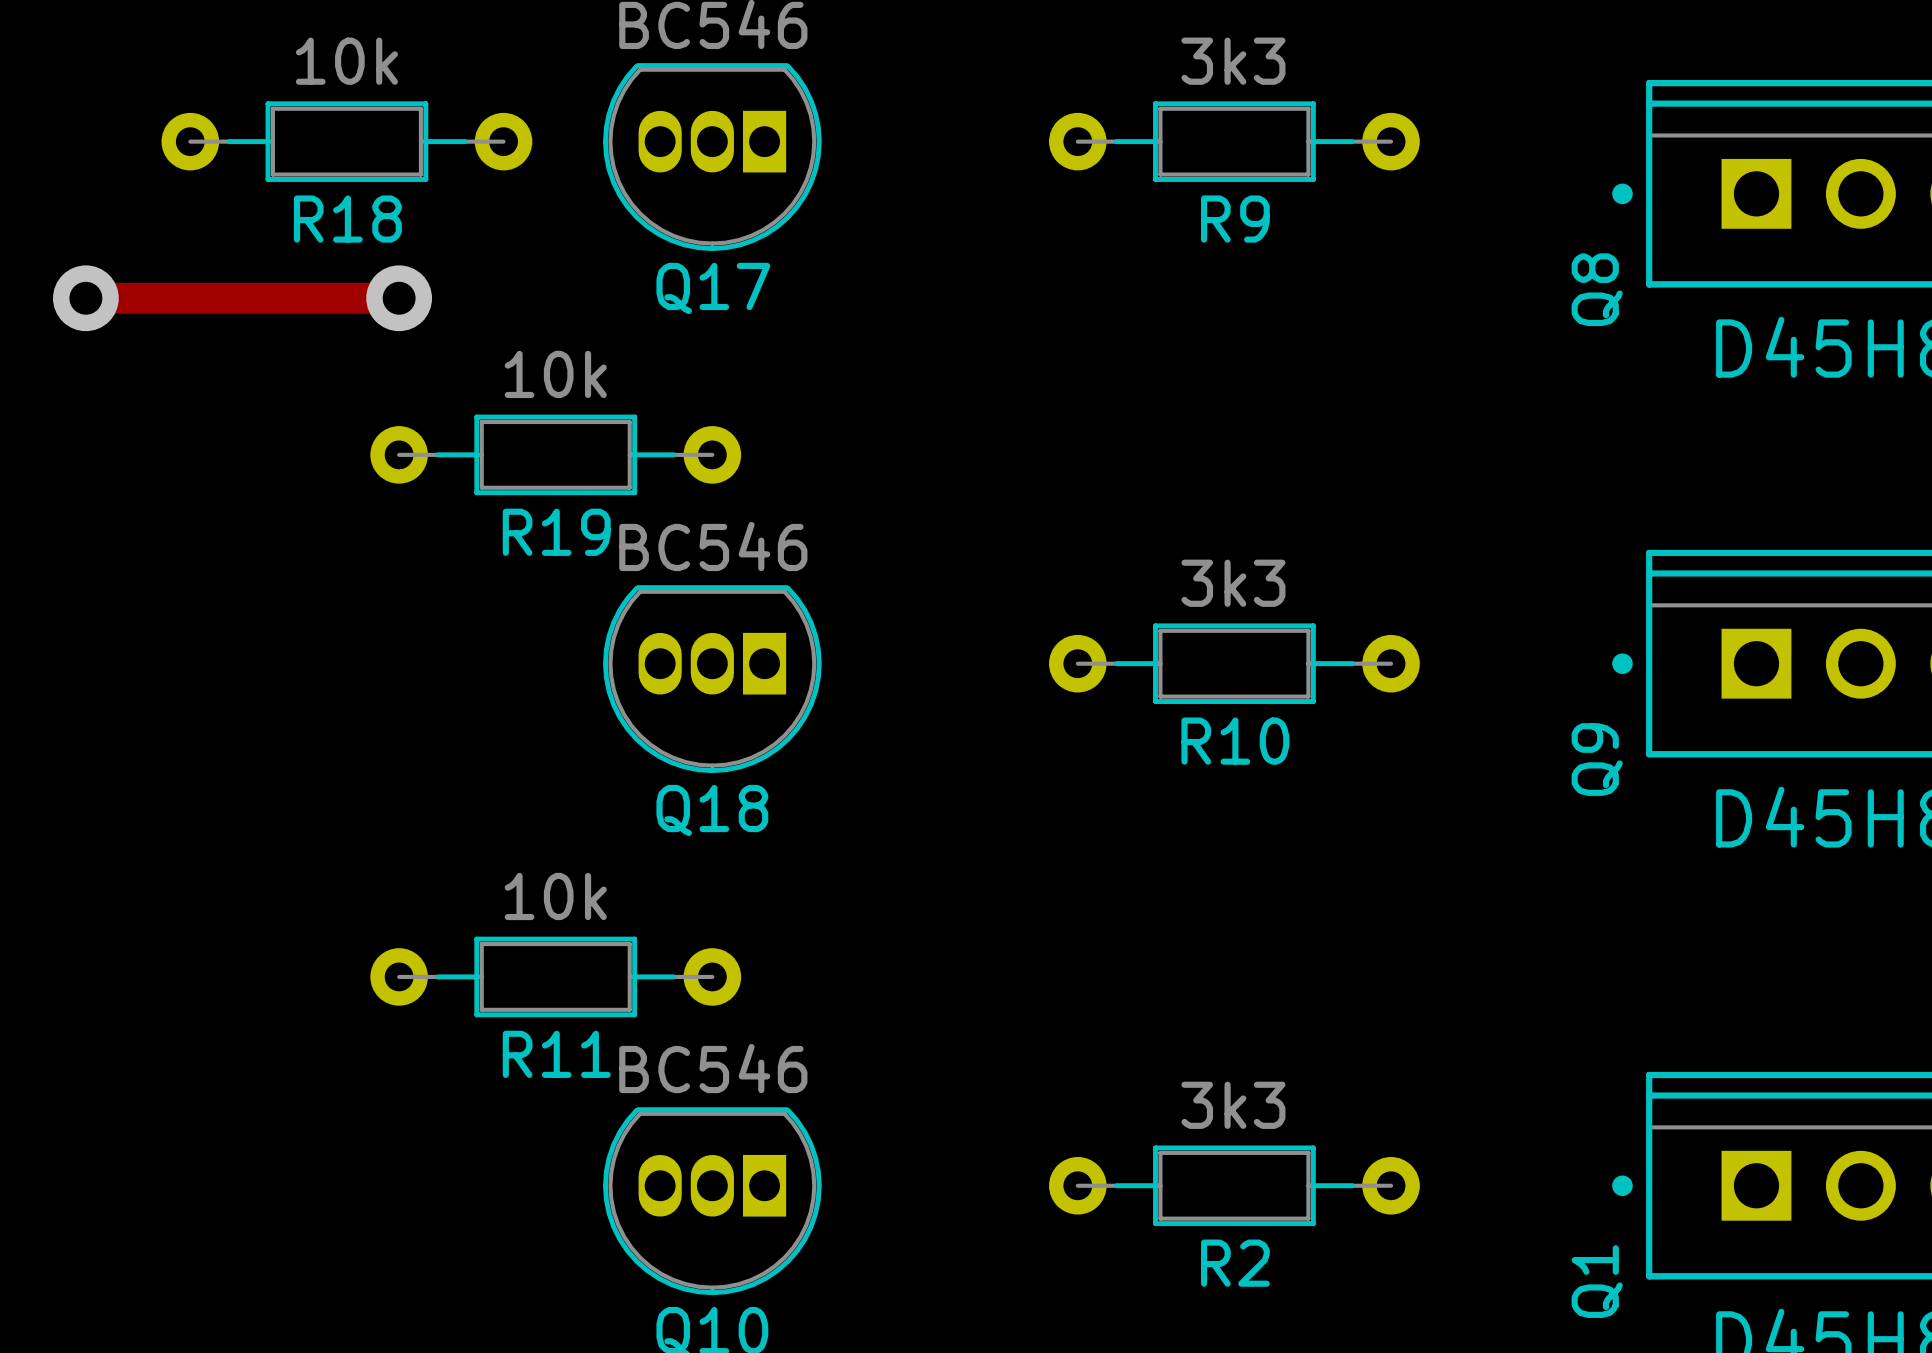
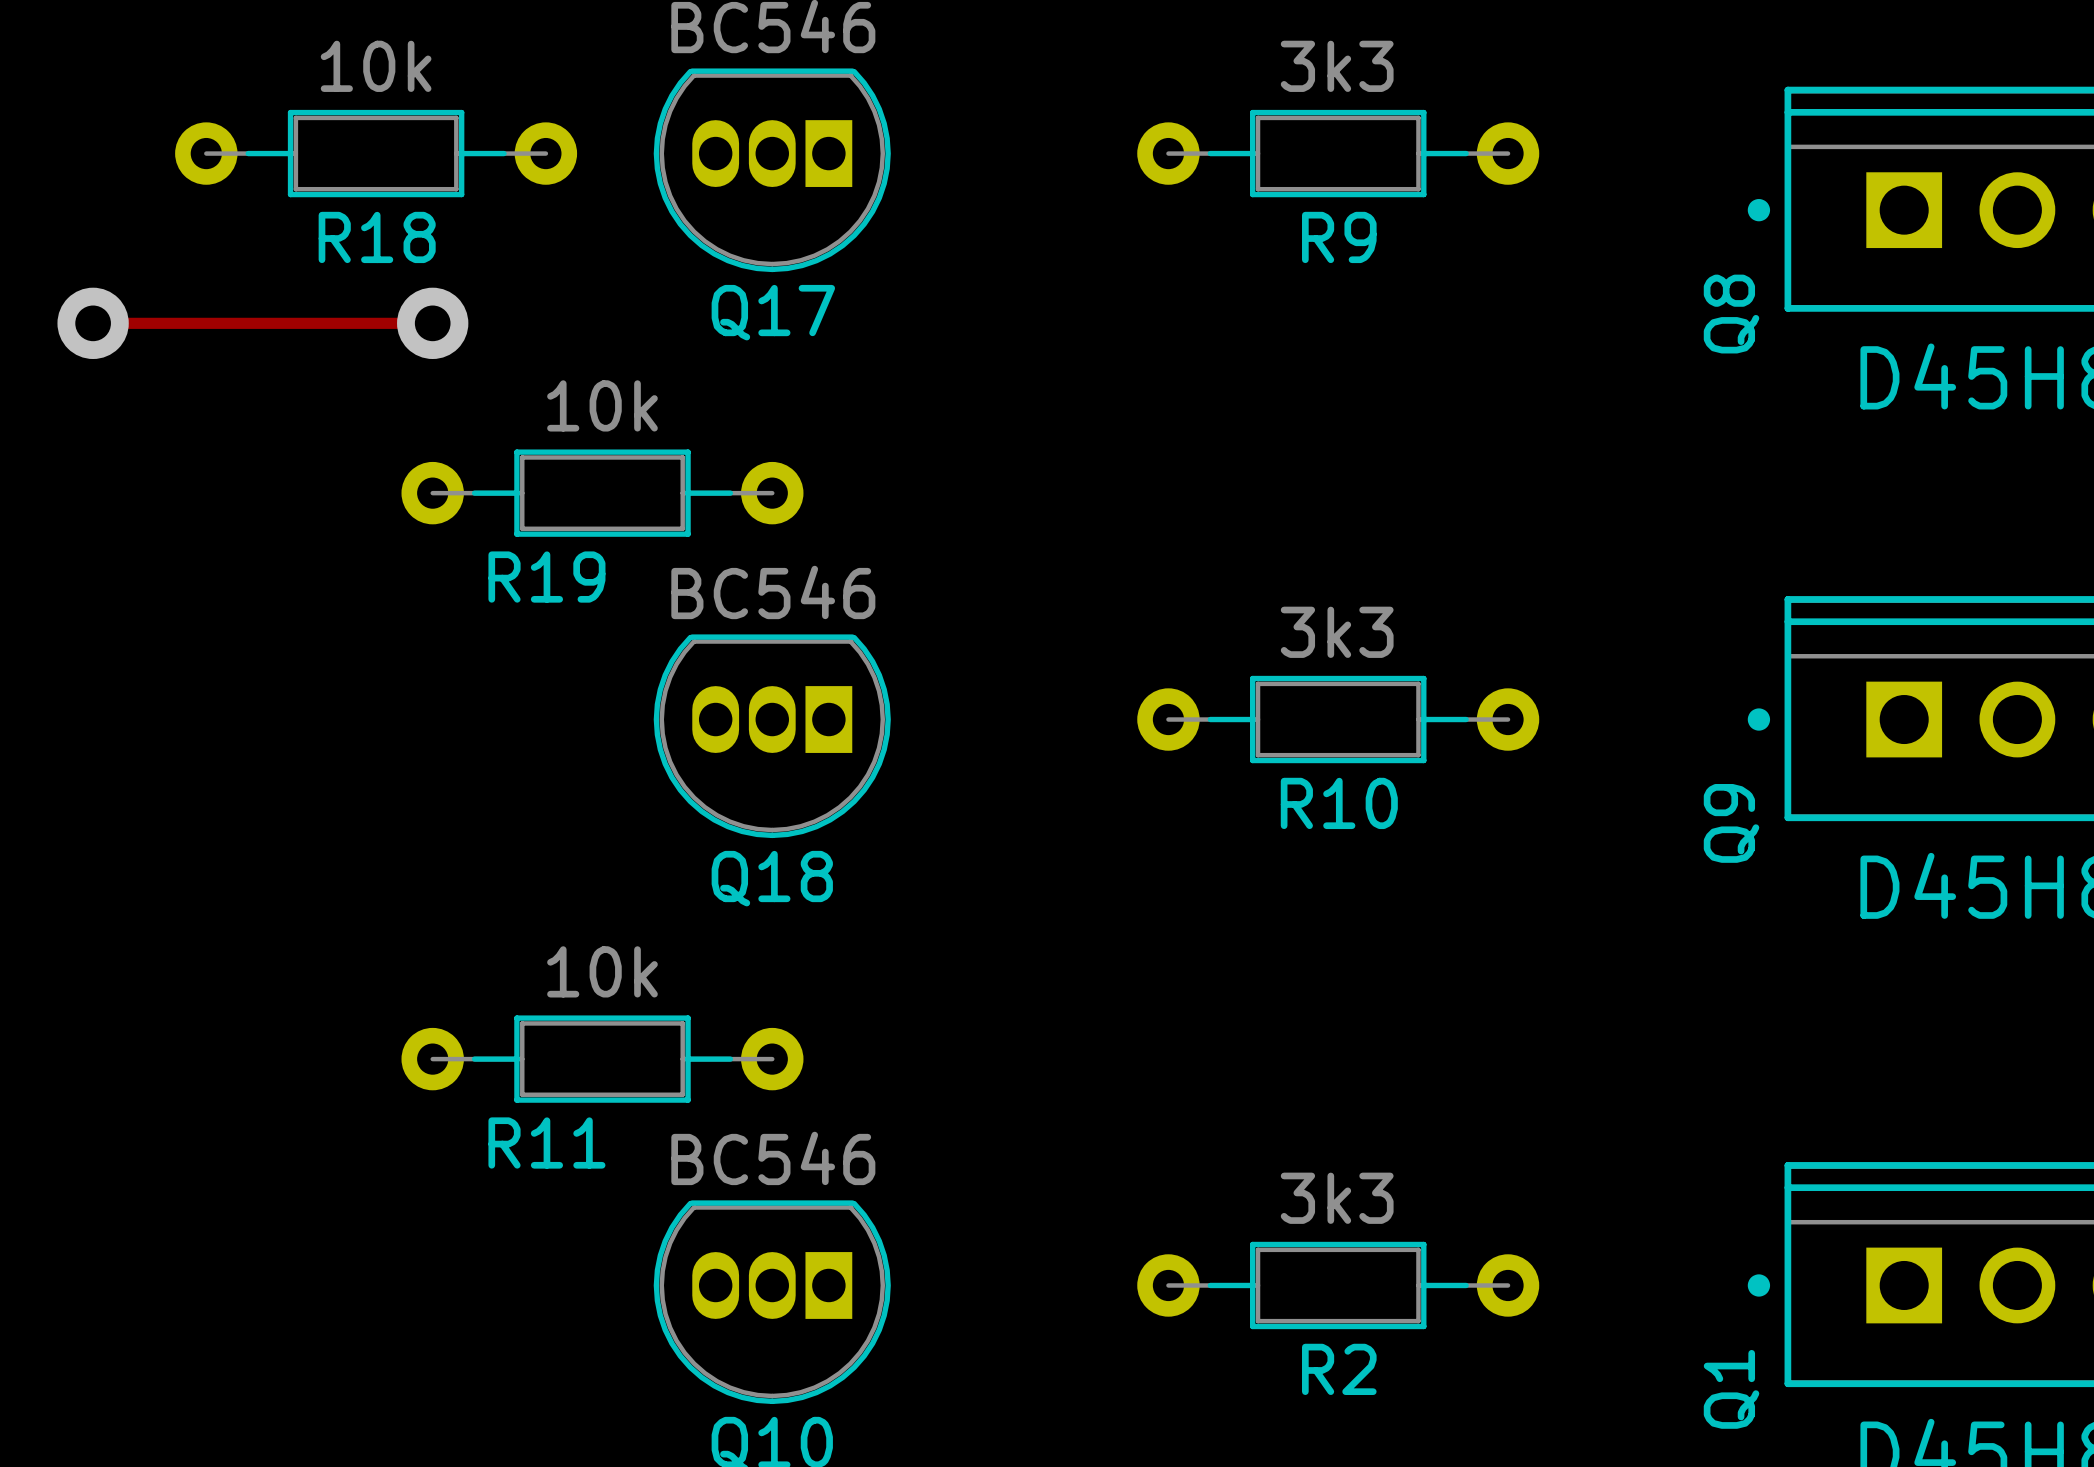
track width: thick (85, 298) (399, 298) -> thin (93, 323) (432, 323)
R19 name position: R19 (556, 532) -> R19 (546, 577)
R11 name position: R11 (556, 1054) -> R11 (546, 1143)

